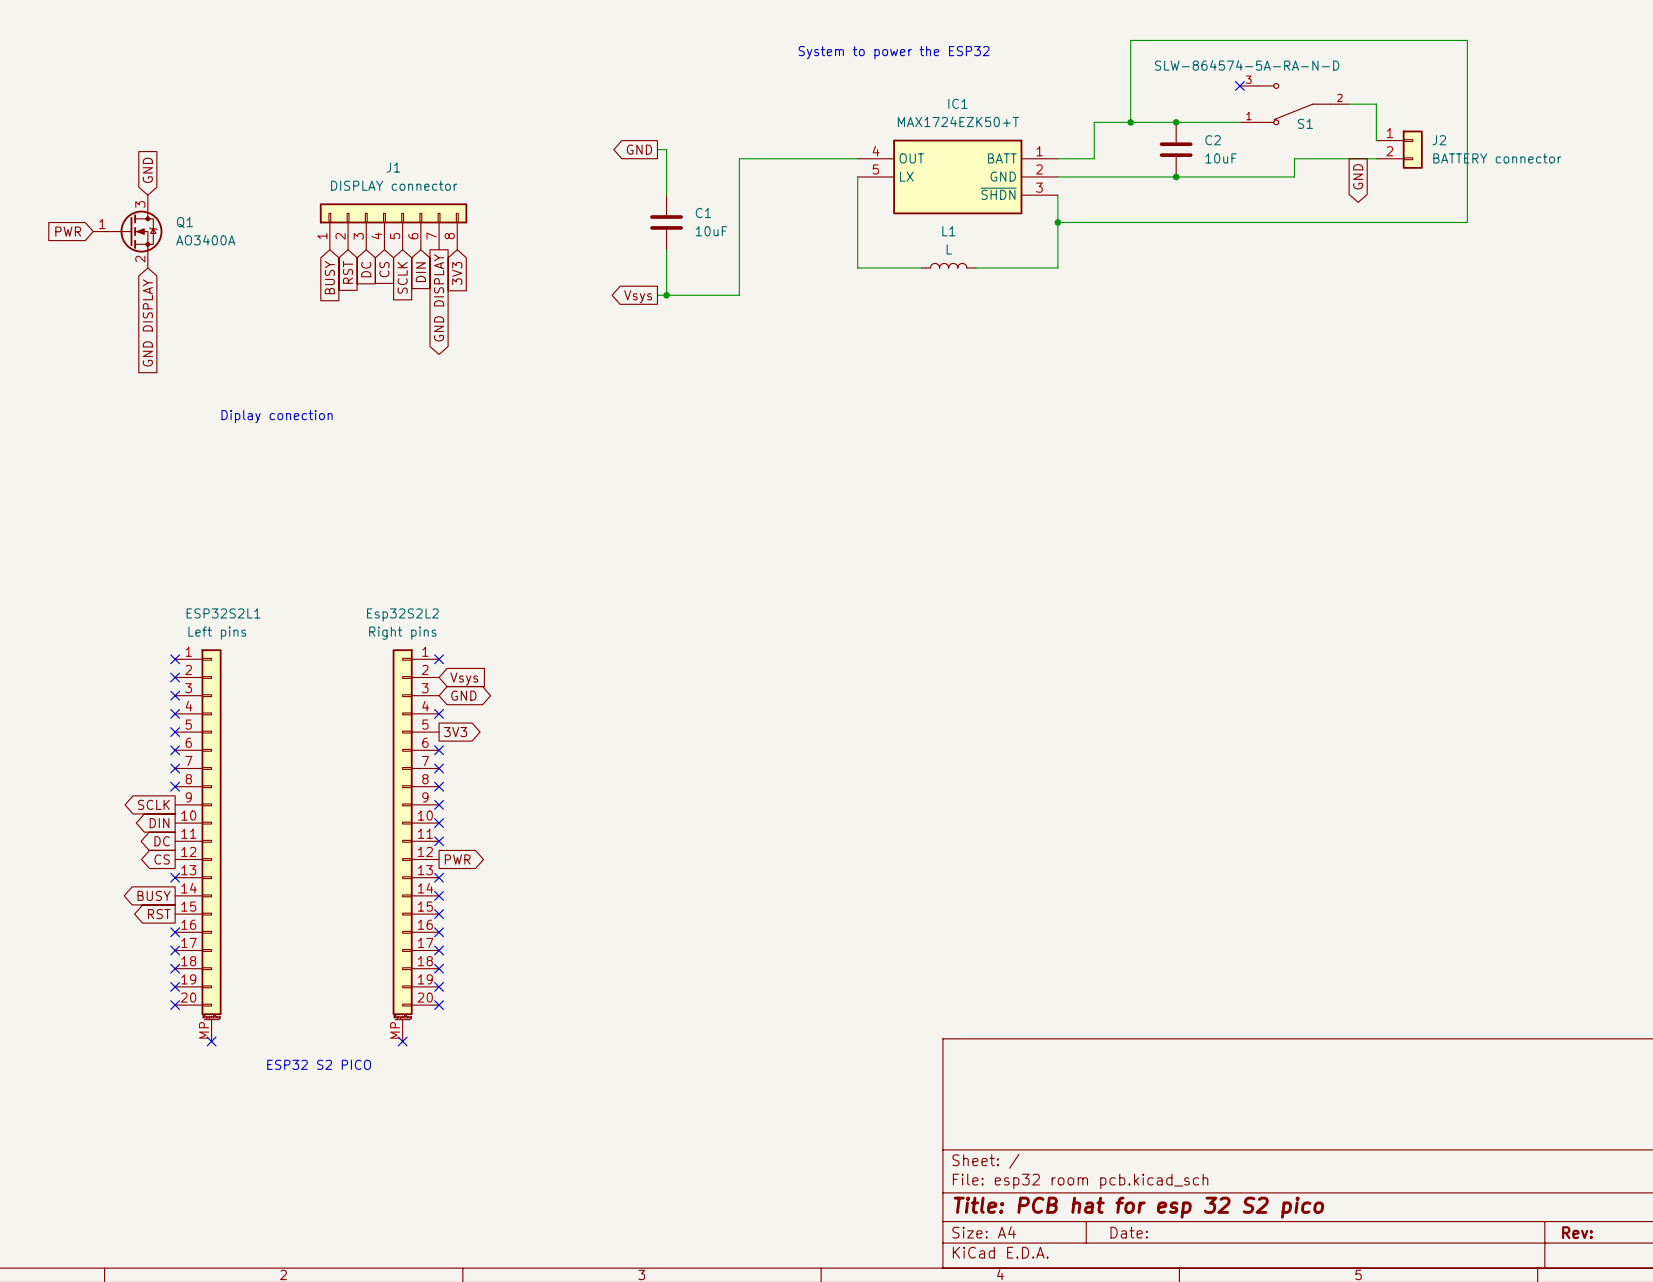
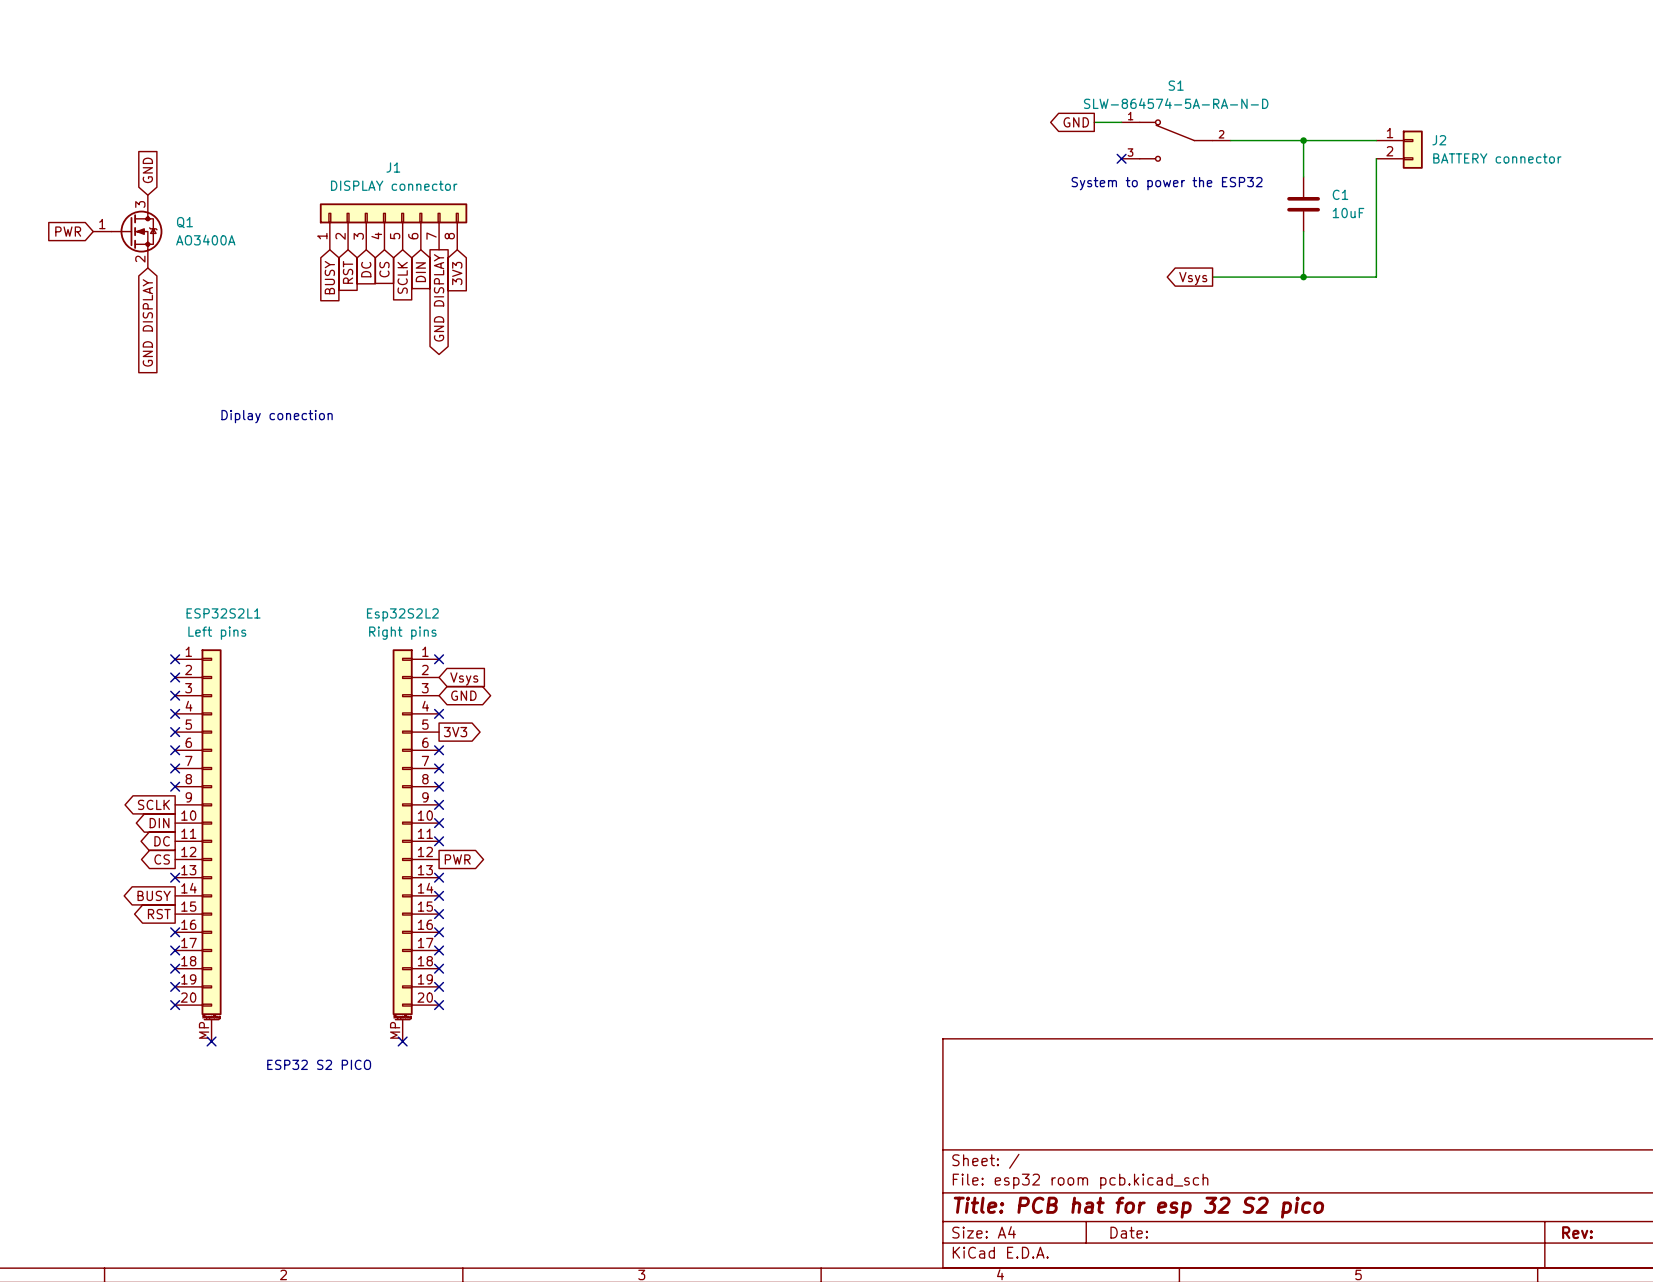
text: System to power the ESP32 (894, 52) -> none
S1 value position: SLW-864574-5A-RA-N-D (1247, 65) -> SLW-864574-5A-RA-N-D (1176, 103)
no-connect mark: (1239, 85) -> none
S1 flip: as is (1294, 104) -> up-down (1176, 140)
S1 position: (1294, 104) -> (1176, 140)
wire: (1349, 104) (1376, 104) (1376, 140) -> (1230, 140) (1376, 140)
global label: none -> GND (1076, 122)
wire: (1094, 122) (1094, 158) (1057, 158) -> none
wire: (1121, 122) (1239, 122) -> none
wire: (1130, 122) (1130, 40) (1467, 40) (1467, 222) (1057, 222) -> none
junction: (1130, 122) -> none
junction: (1176, 122) -> none
S1 name position: S1 (1305, 123) -> S1 (1176, 85)
wire: none -> (1303, 140) (1303, 176)
junction: none -> (1303, 140)
global label: GND (639, 149) -> none
wire: (657, 149) (666, 149) (666, 195) -> none
C2: 10uF (1176, 149) -> none
wire: (857, 158) (739, 158) (739, 295) (657, 295) -> none
no-connect mark: none -> (1121, 158)
wire: (1376, 158) (1294, 158) (1294, 176) (1057, 176) -> (1376, 158) (1376, 277) (1212, 277)
wire: (857, 176) (857, 267) (921, 267) -> none
IC1: MAX1724EZK50+T (957, 176) -> none
junction: (1176, 176) -> none
global label: GND (1358, 176) -> none
text: none -> System to power the ESP32 (1167, 183)
wire: (1057, 195) (1057, 267) (975, 267) -> none
C1 position: (666, 222) -> (1303, 204)
junction: (1057, 222) -> none
wire: none -> (1303, 231) (1303, 277)
wire: (666, 249) (666, 295) -> none
L1: L (948, 265) -> none
junction: none -> (1303, 277)
global label: none -> Vsys (1193, 278)
junction: (666, 295) -> none
global label: Vsys (638, 296) -> none

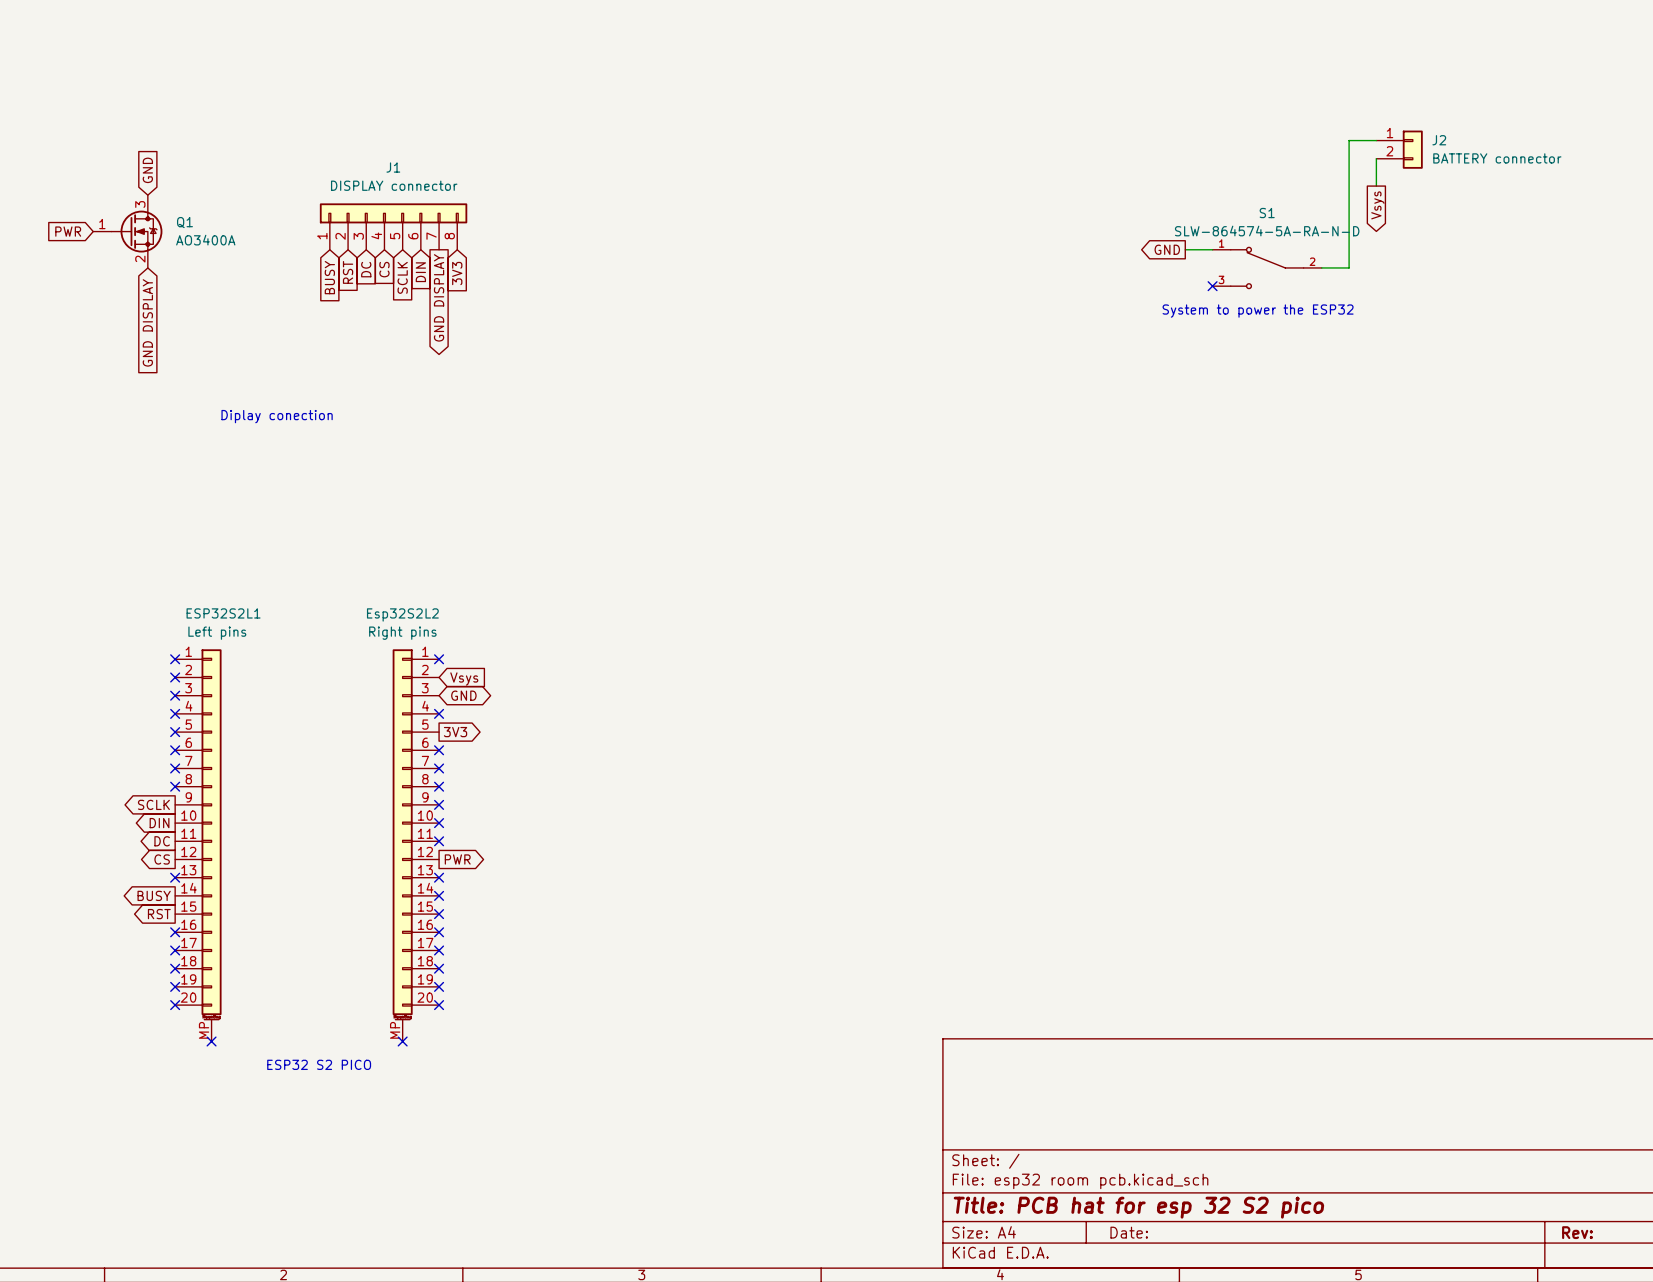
global label position: GND (1076, 122) -> GND (1167, 249)
wire: (1094, 122) (1121, 122) -> (1185, 249) (1212, 249)
S1 position: (1176, 140) -> (1267, 267)
wire: (1230, 140) (1349, 140) -> (1321, 267) (1349, 267) (1349, 140)
wire: (1303, 140) (1303, 176) -> none
junction: (1303, 140) -> none
no-connect mark: (1121, 158) -> none
text position: System to power the ESP32 (1167, 183) -> System to power the ESP32 (1258, 311)
wire: (1376, 186) (1376, 277) (1212, 277) -> none
C1: 10uF (1303, 204) -> none
global label: none -> Vsys (1377, 205)
wire: (1303, 231) (1303, 277) -> none
junction: (1303, 277) -> none
global label: Vsys (1193, 278) -> none
no-connect mark: none -> (1212, 286)

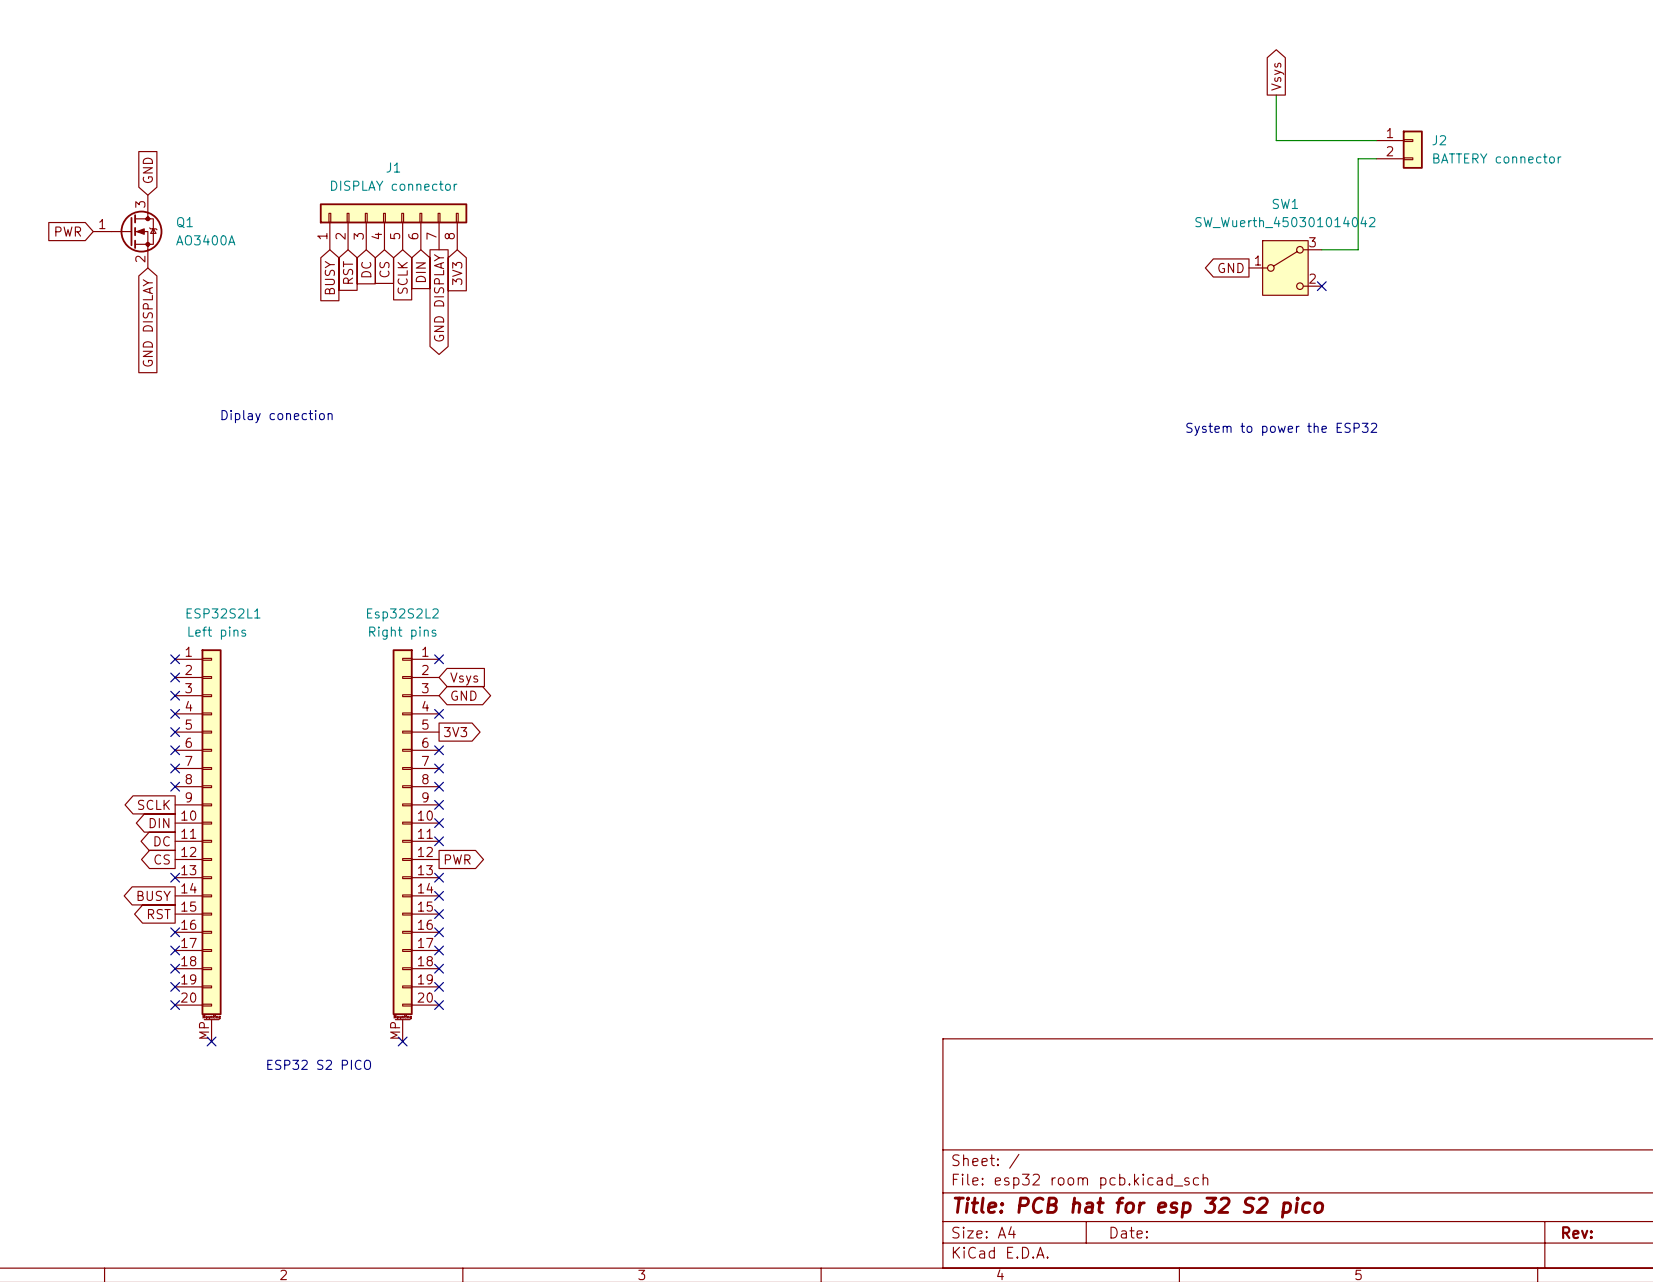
wire: (1349, 140) (1349, 267) (1321, 267) -> (1349, 140) (1276, 140) (1276, 95)
wire: (1376, 158) (1376, 186) -> (1376, 158) (1358, 158) (1358, 249) (1321, 249)
global label rotation: 0° (1377, 205) -> 180° (1277, 76)
global label position: Vsys (1377, 205) -> Vsys (1277, 76)
global label position: GND (1167, 249) -> GND (1230, 267)
wire: (1185, 249) (1212, 249) -> none
S1: SLW-864574-5A-RA-N-D (1267, 267) -> none
SW1: none -> SW_Wuerth_450301014042 (1285, 267)
no-connect mark: (1212, 286) -> none
no-connect mark: none -> (1321, 286)
text position: System to power the ESP32 (1258, 311) -> System to power the ESP32 (1281, 429)

